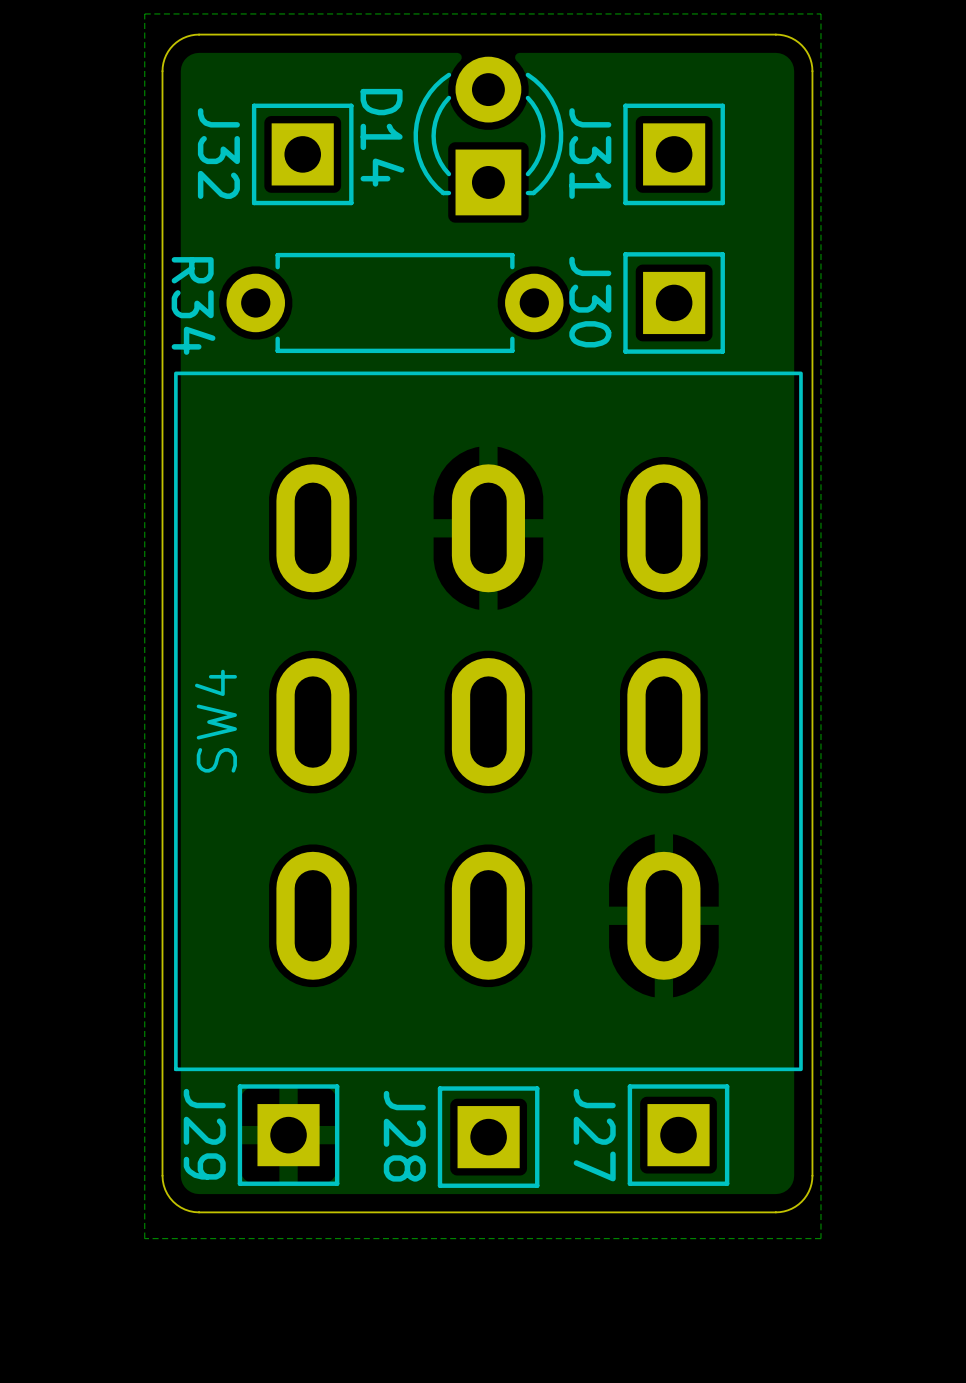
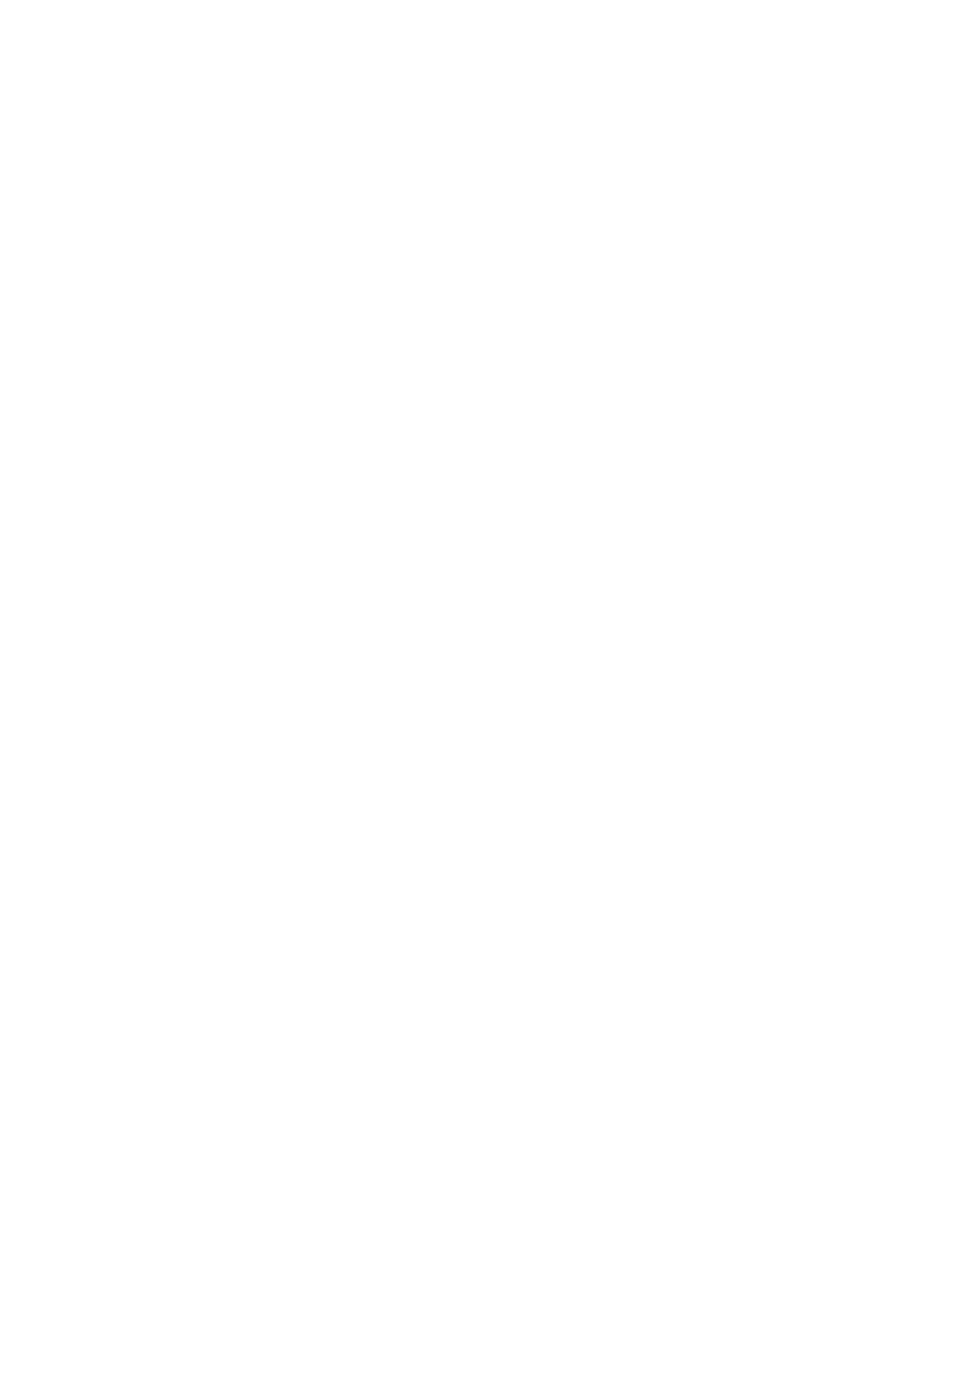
zone outline: (820, 13) (144, 13) (144, 1238) (820, 1238) (820, 13) -> none
board edge: (775, 34) (199, 34) (179, 40) (166, 55) (162, 71) (162, 1175) (167, 1194) (180, 1207) (199, 1212) (775, 1212) (795, 1206) (808, 1191) (812, 1175) (812, 71) (810, 59) (801, 45) (791, 38) (775, 34) -> none
D14: (488, 136) -> none
J32: (302, 154) -> none
J31: (674, 154) -> none
R34: (395, 302) -> none
J30: (674, 302) -> none
SW4: (488, 721) -> none
J29: (288, 1135) -> none
J27: (678, 1135) -> none
J28: (488, 1137) -> none

